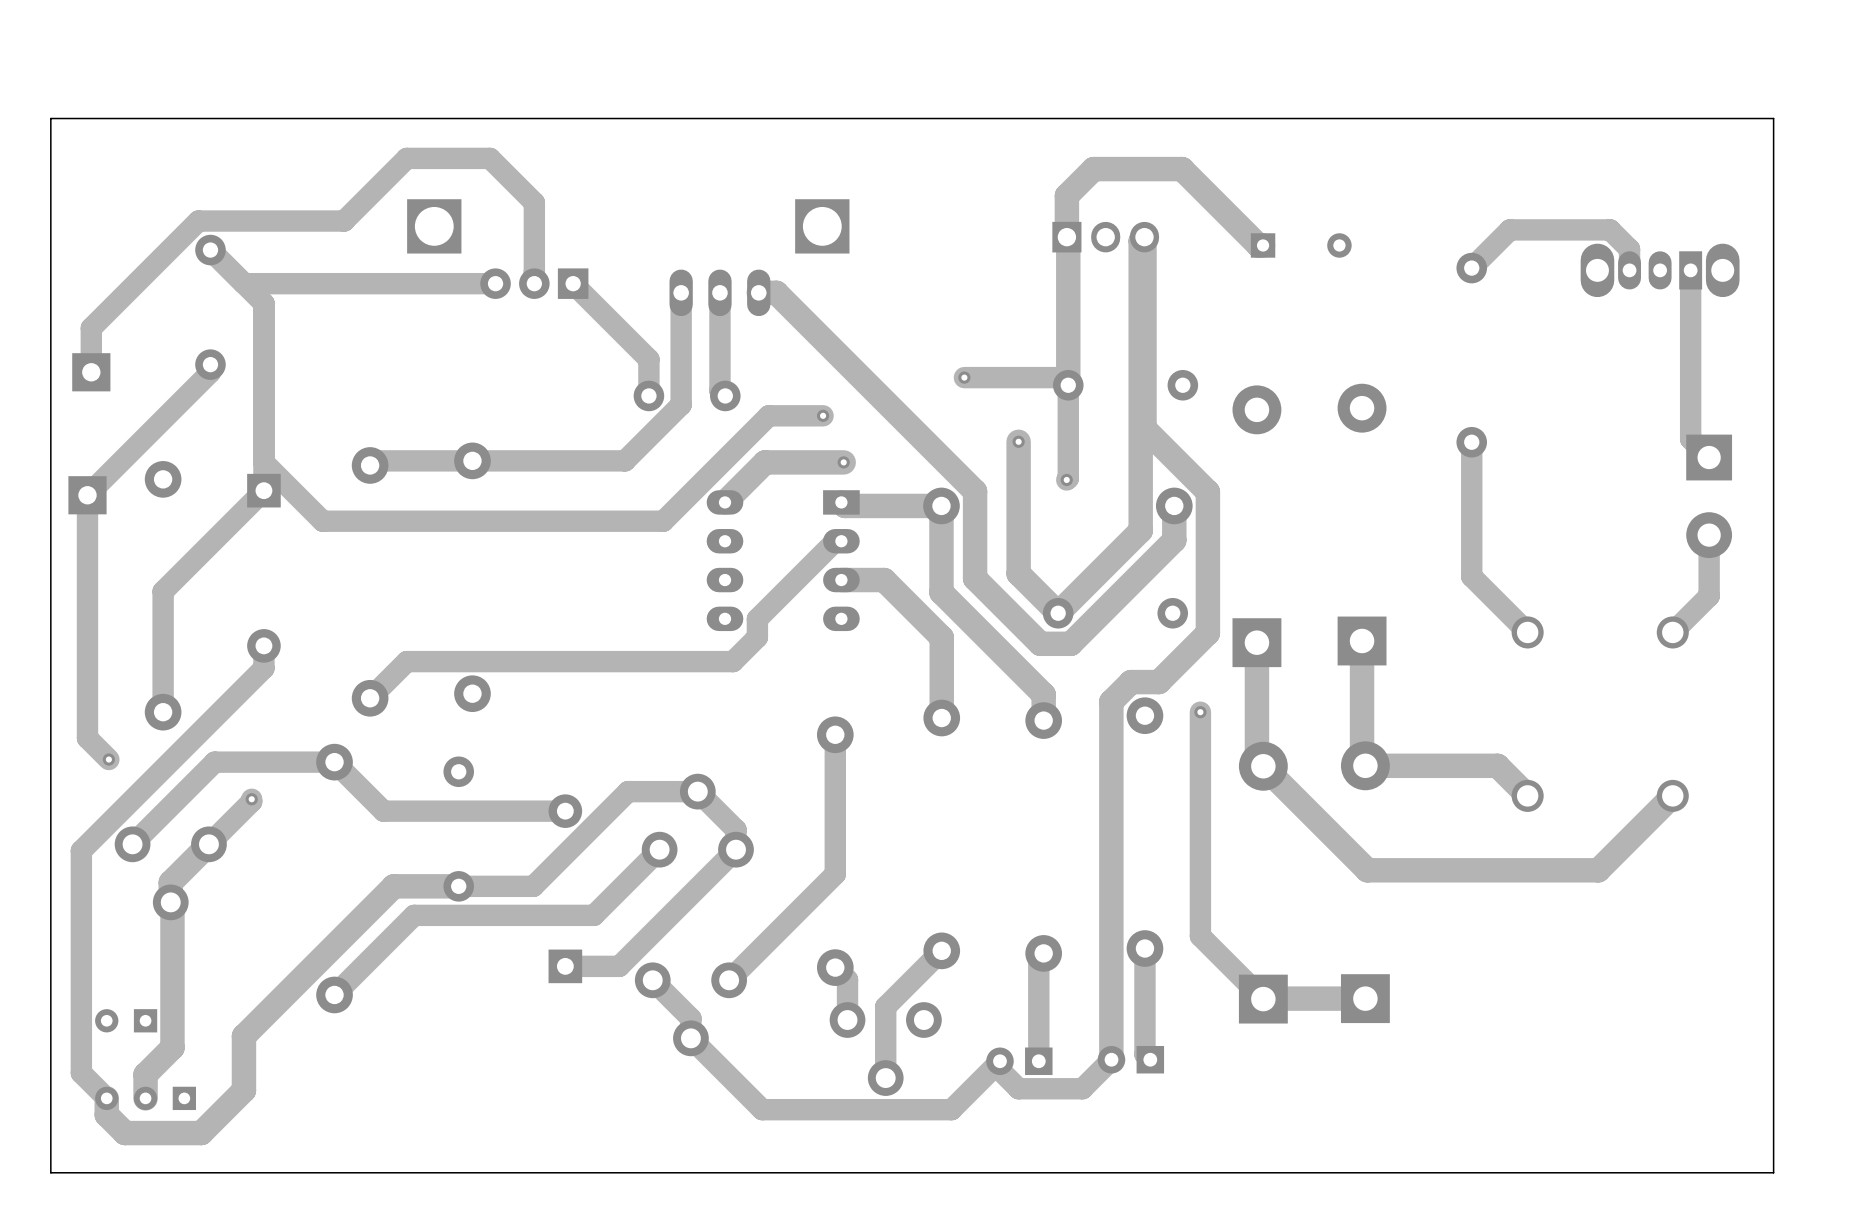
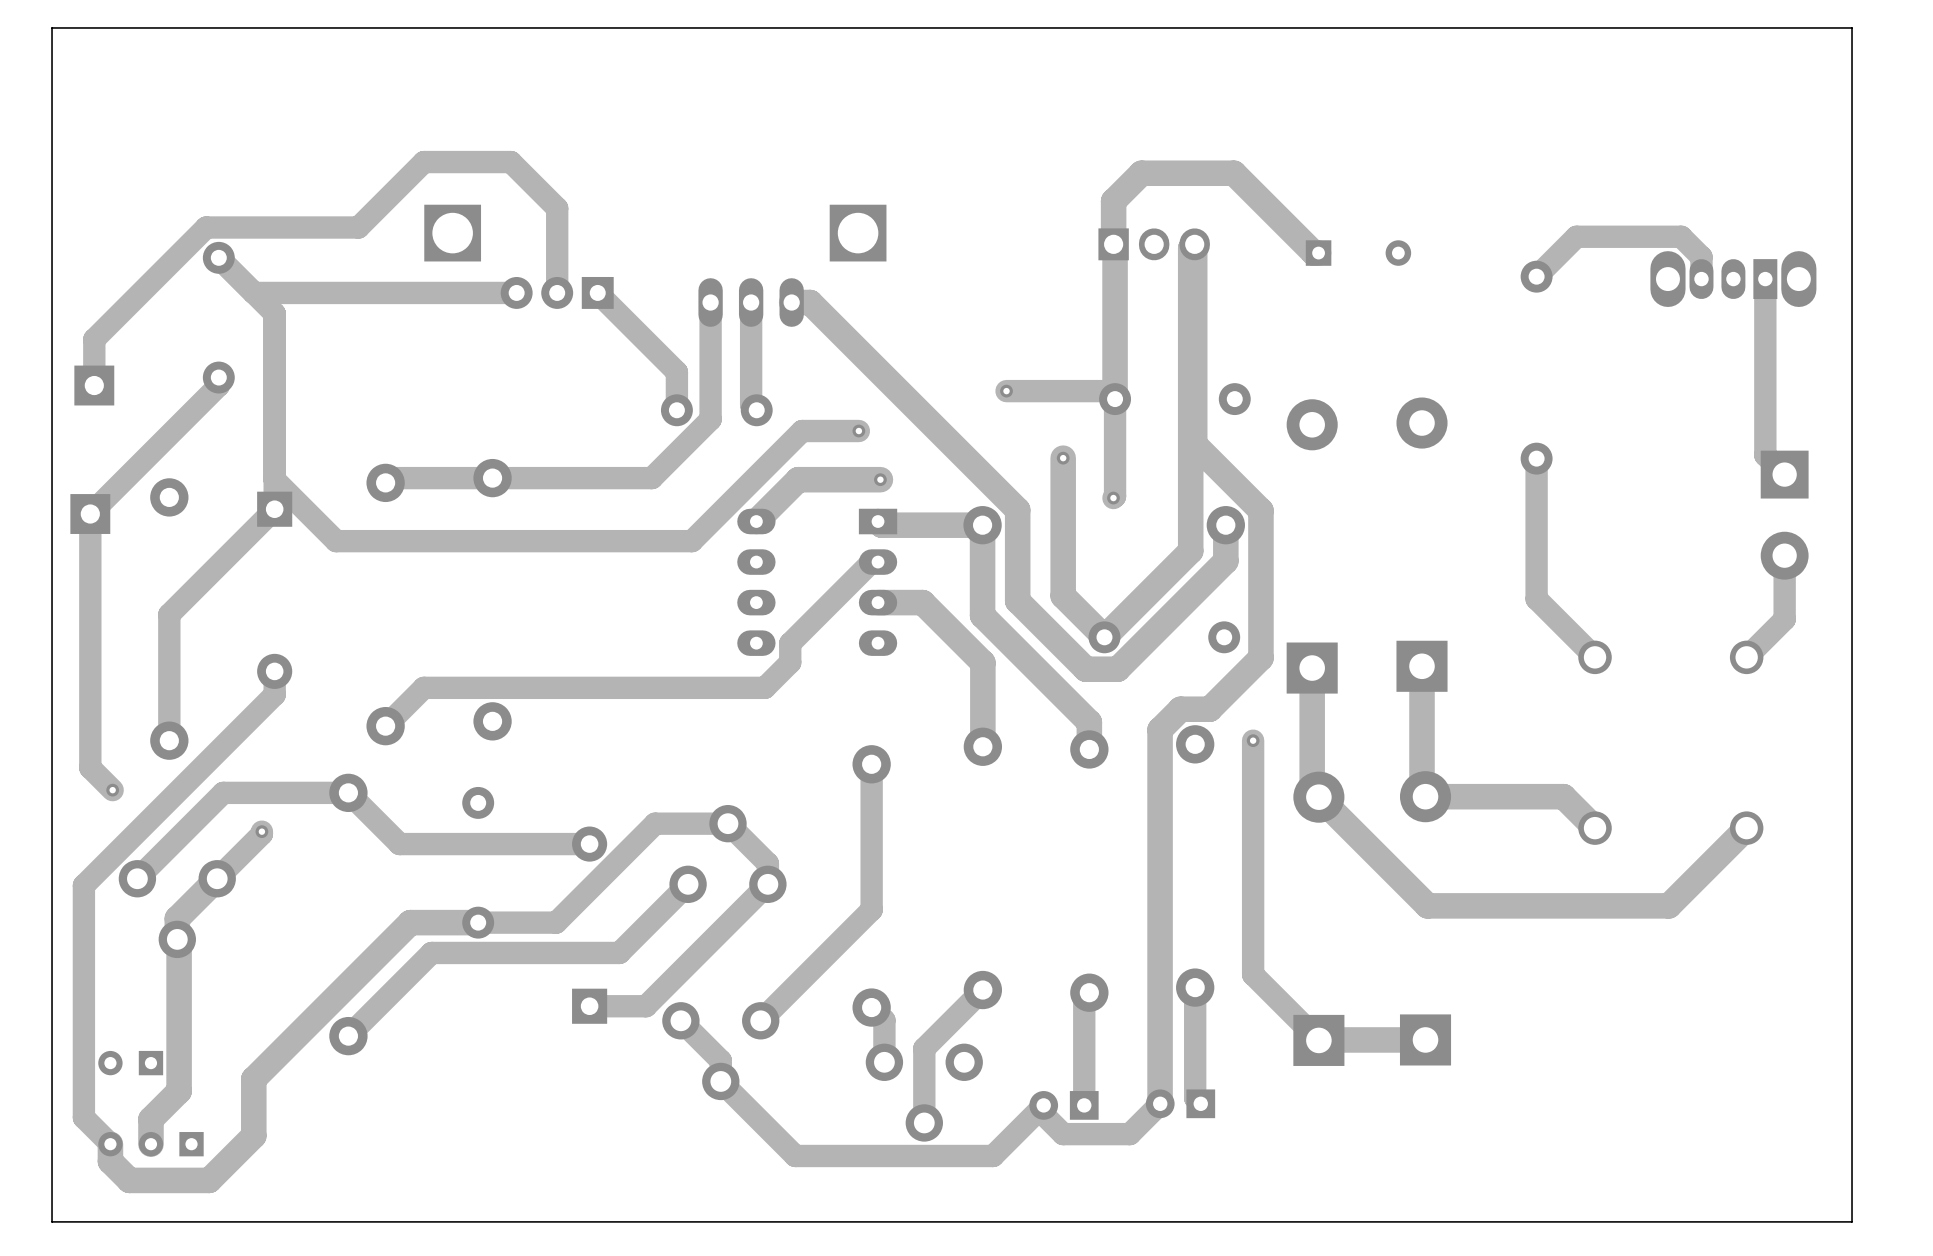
board edge: (1773, 118) (50, 118) -> (1852, 120) (1852, 27) (52, 27) (52, 120)

